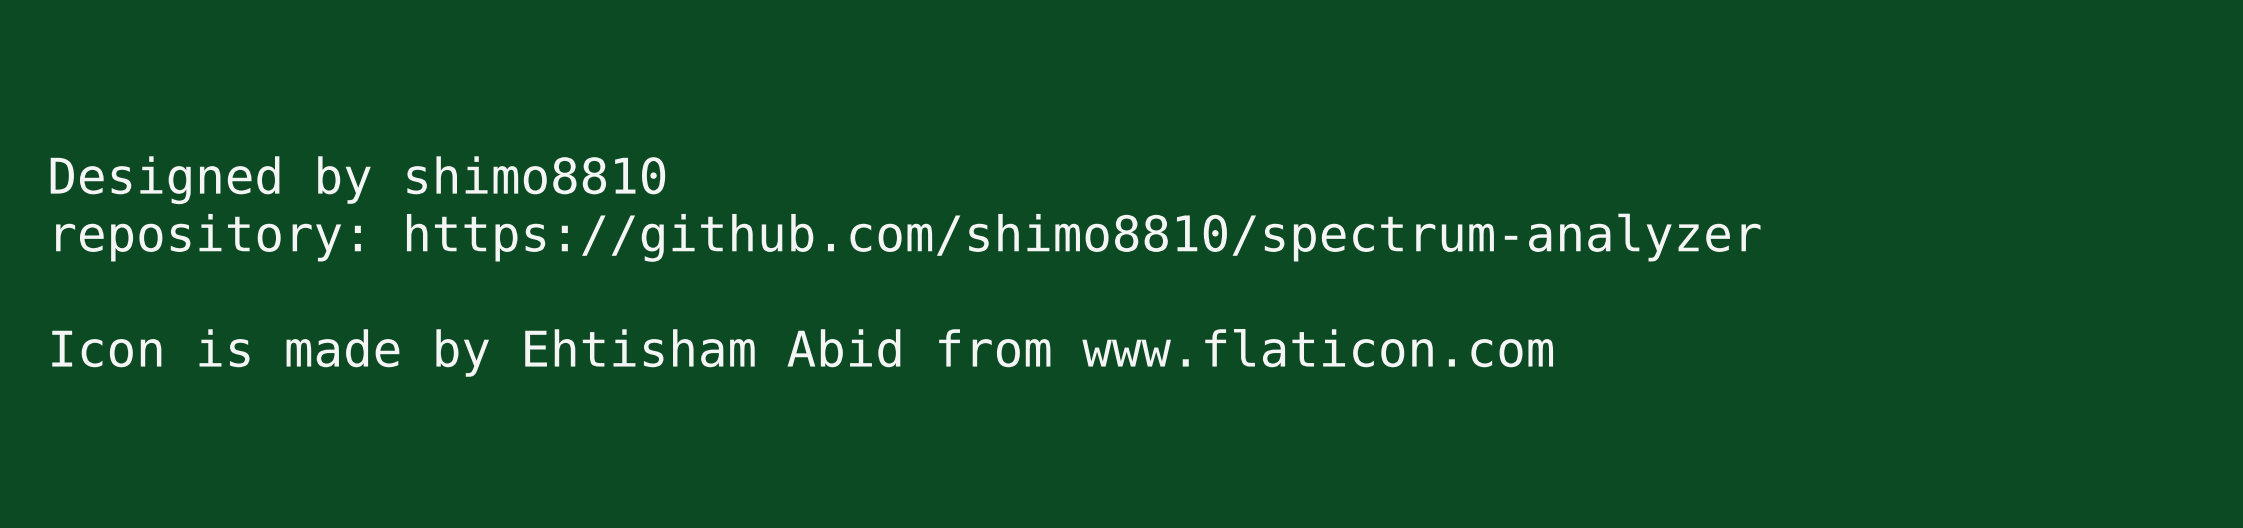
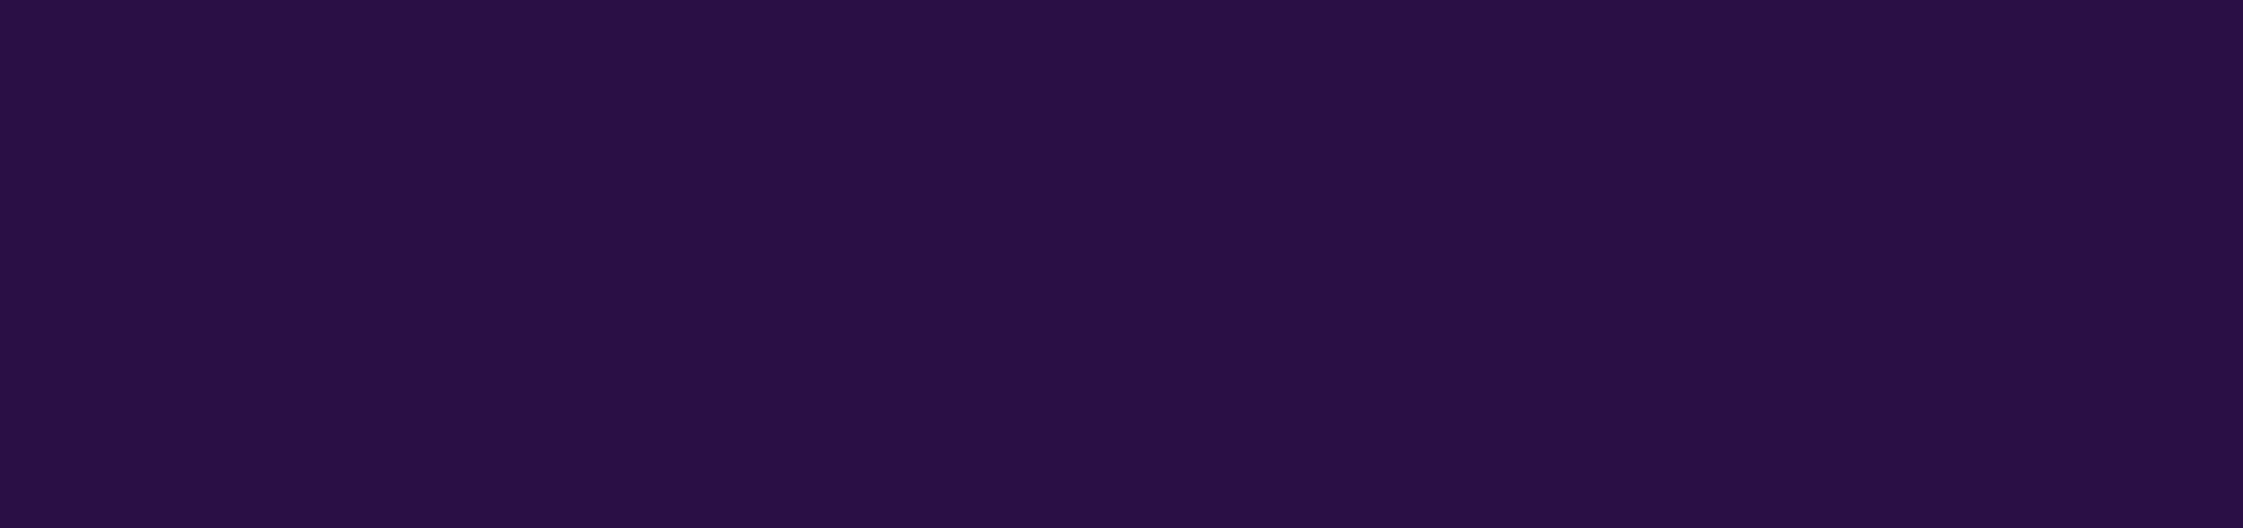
text: Designed by shimo8810 (357, 180) -> none
text: repository: https://github.com/shimo8810/spectrum-analyzer (908, 237) -> none
text: Icon is made by Ehtisham Abid from www.flaticon.com (802, 352) -> none

